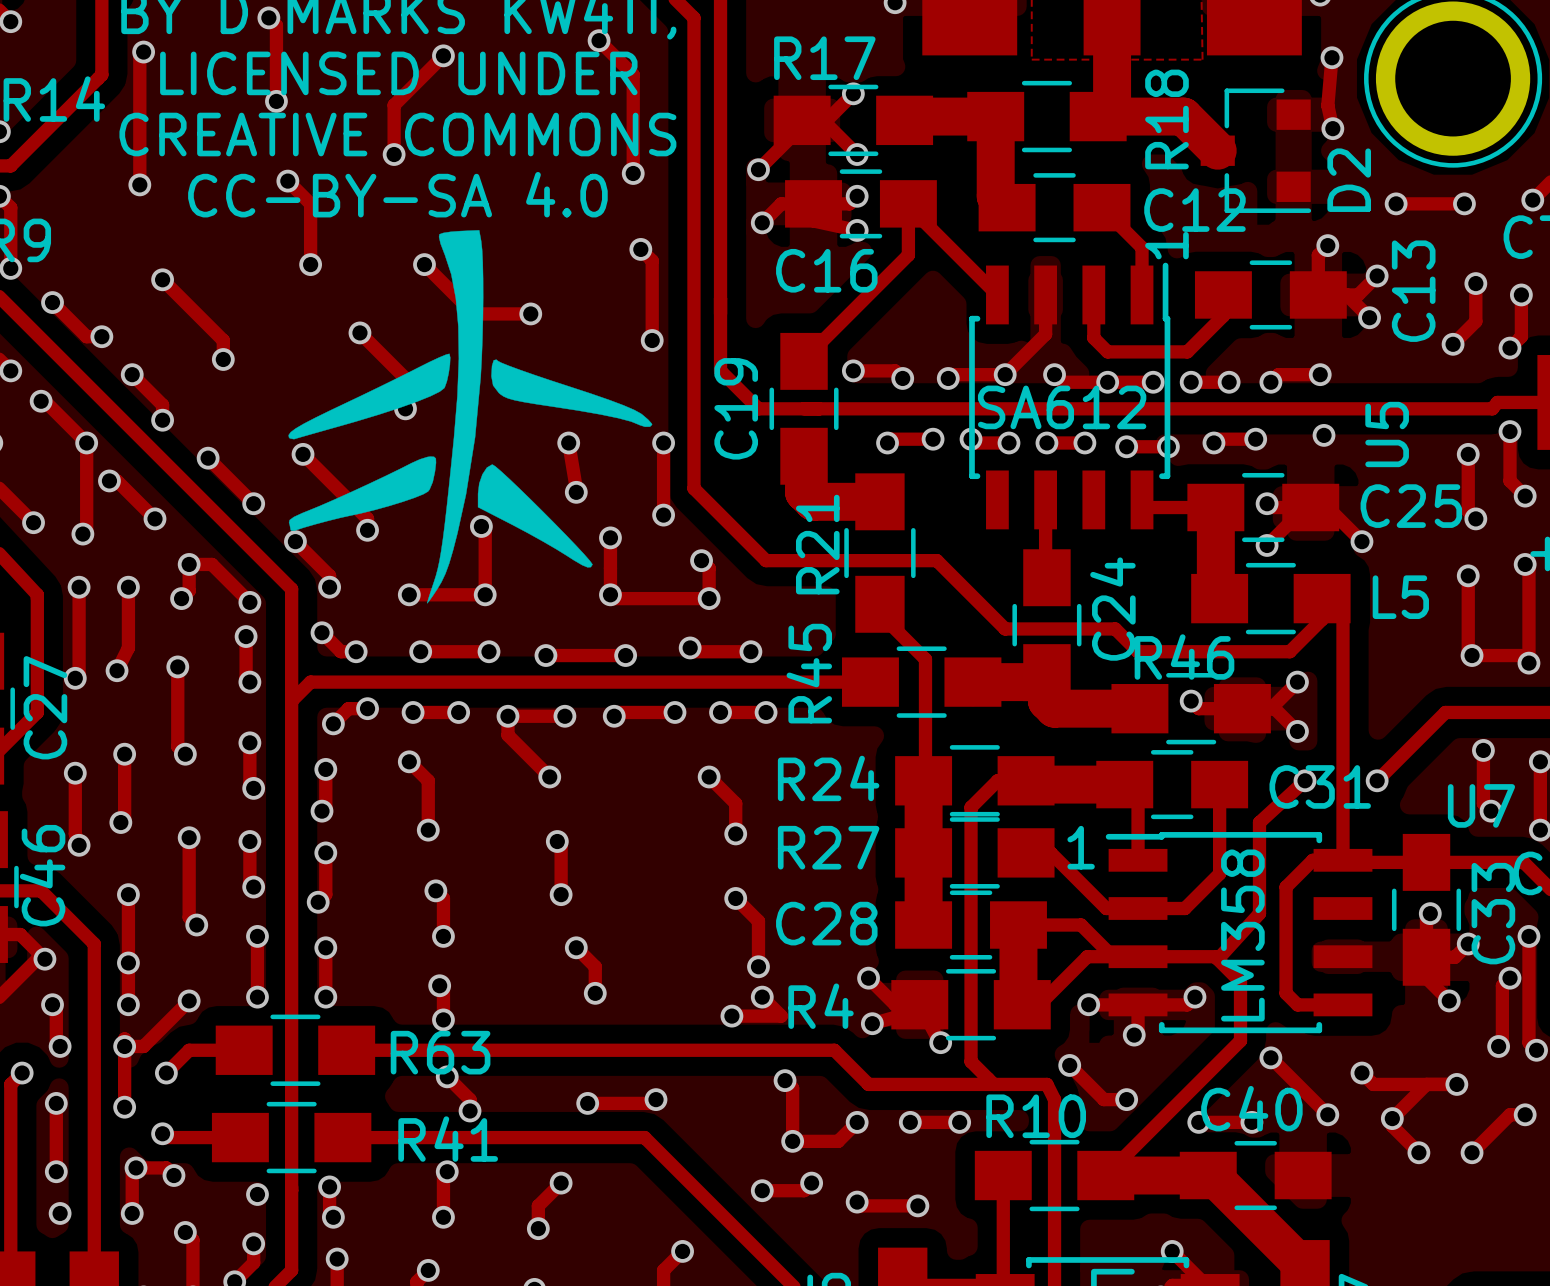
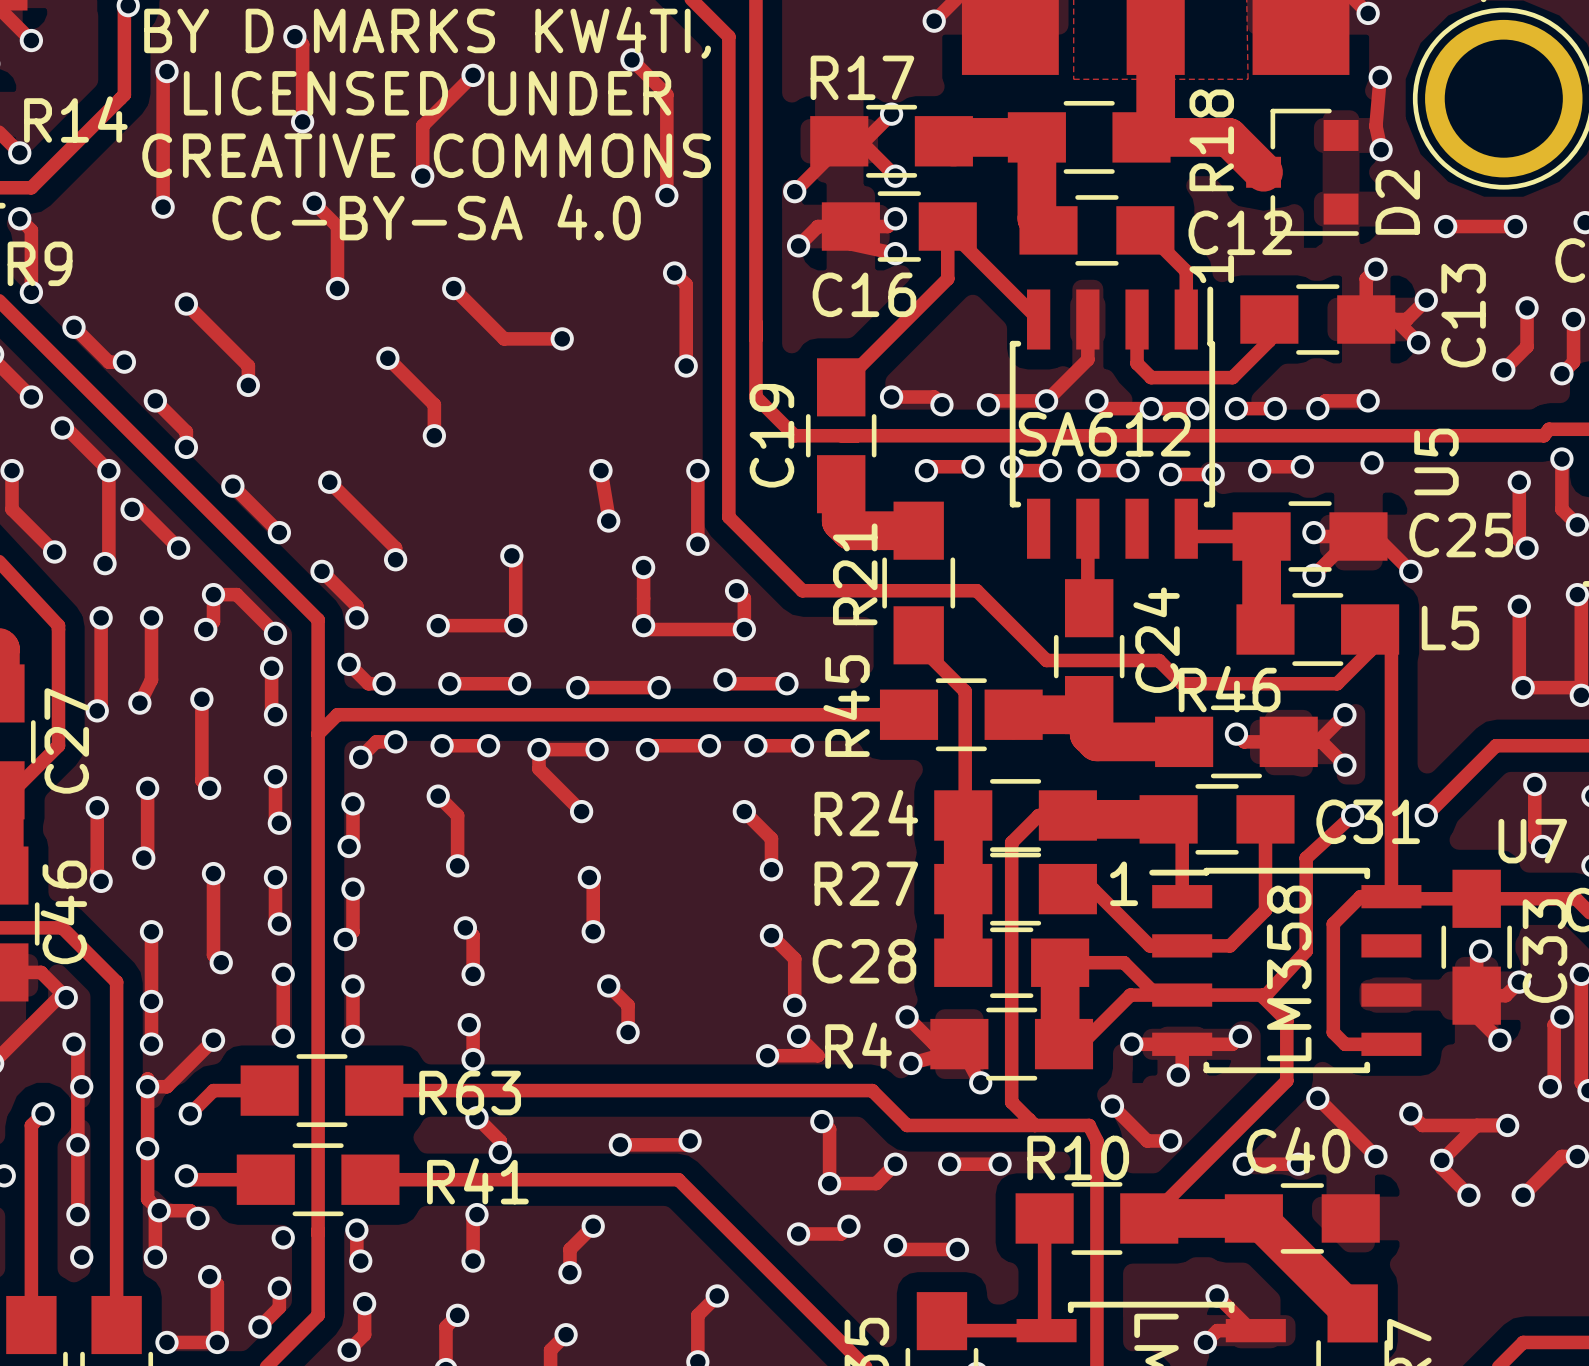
drawing: [288, 230, 653, 604] -> none
track: none -> (81, 1086) (77, 1090) (77, 1144)
track: none -> (147, 1148) (147, 1199) (159, 1210)

